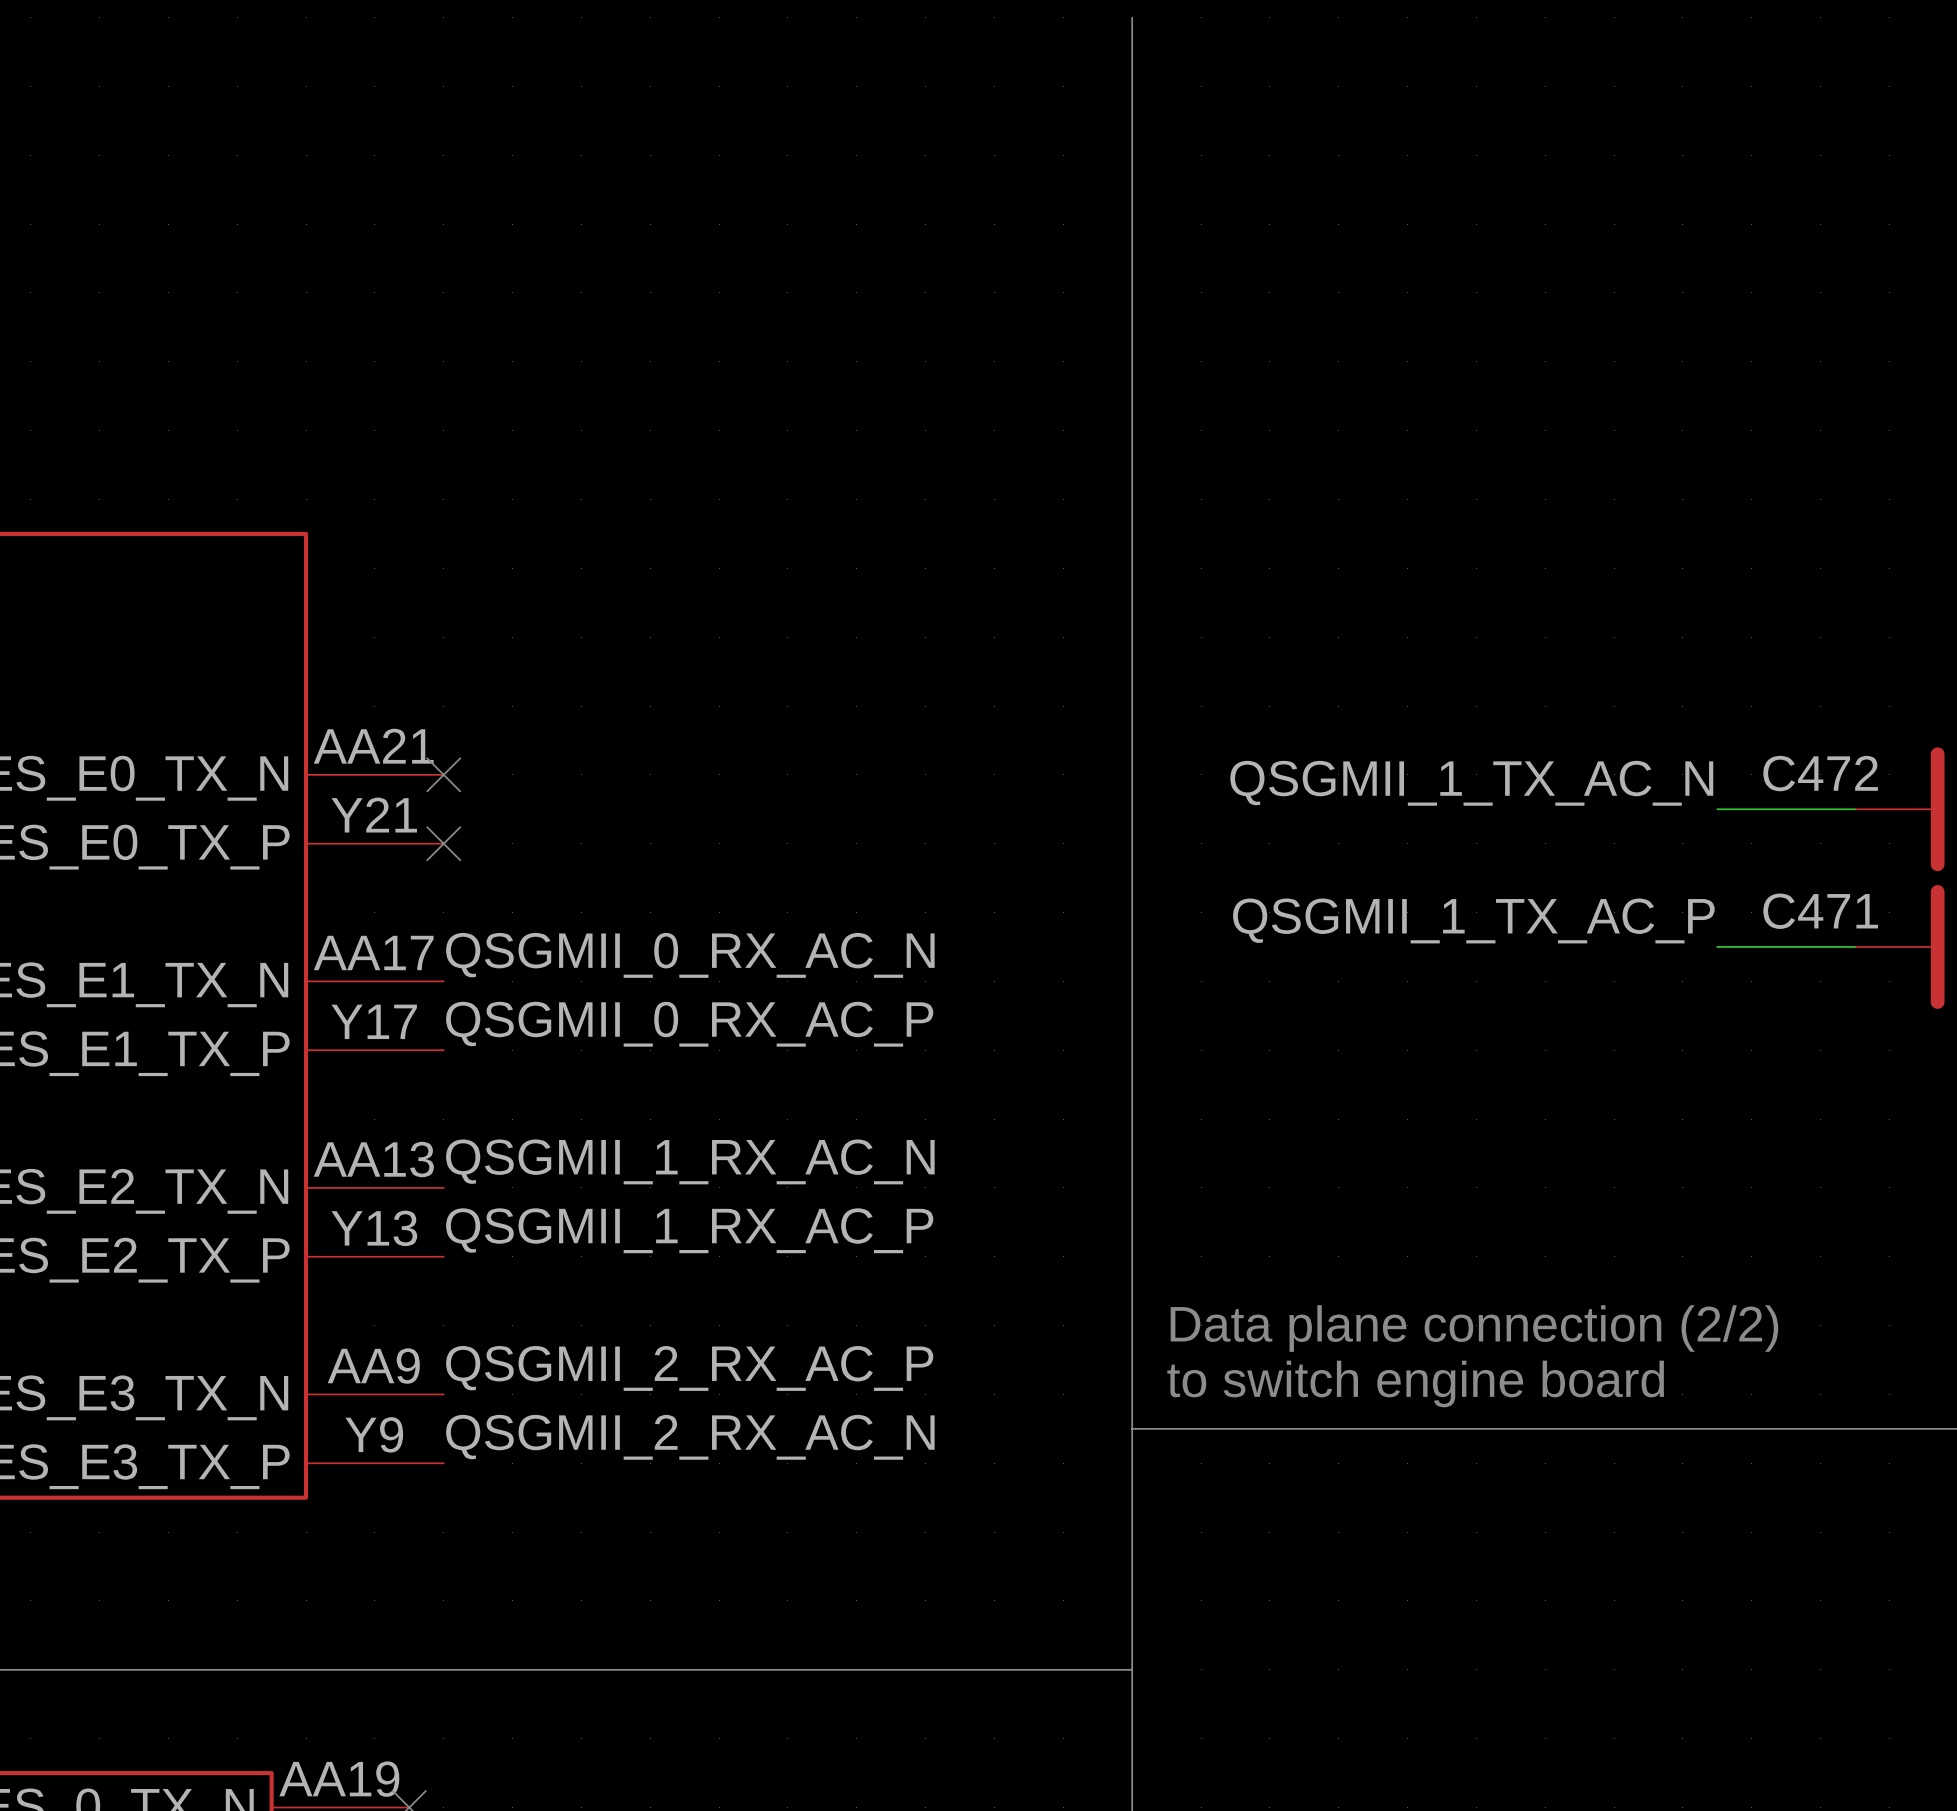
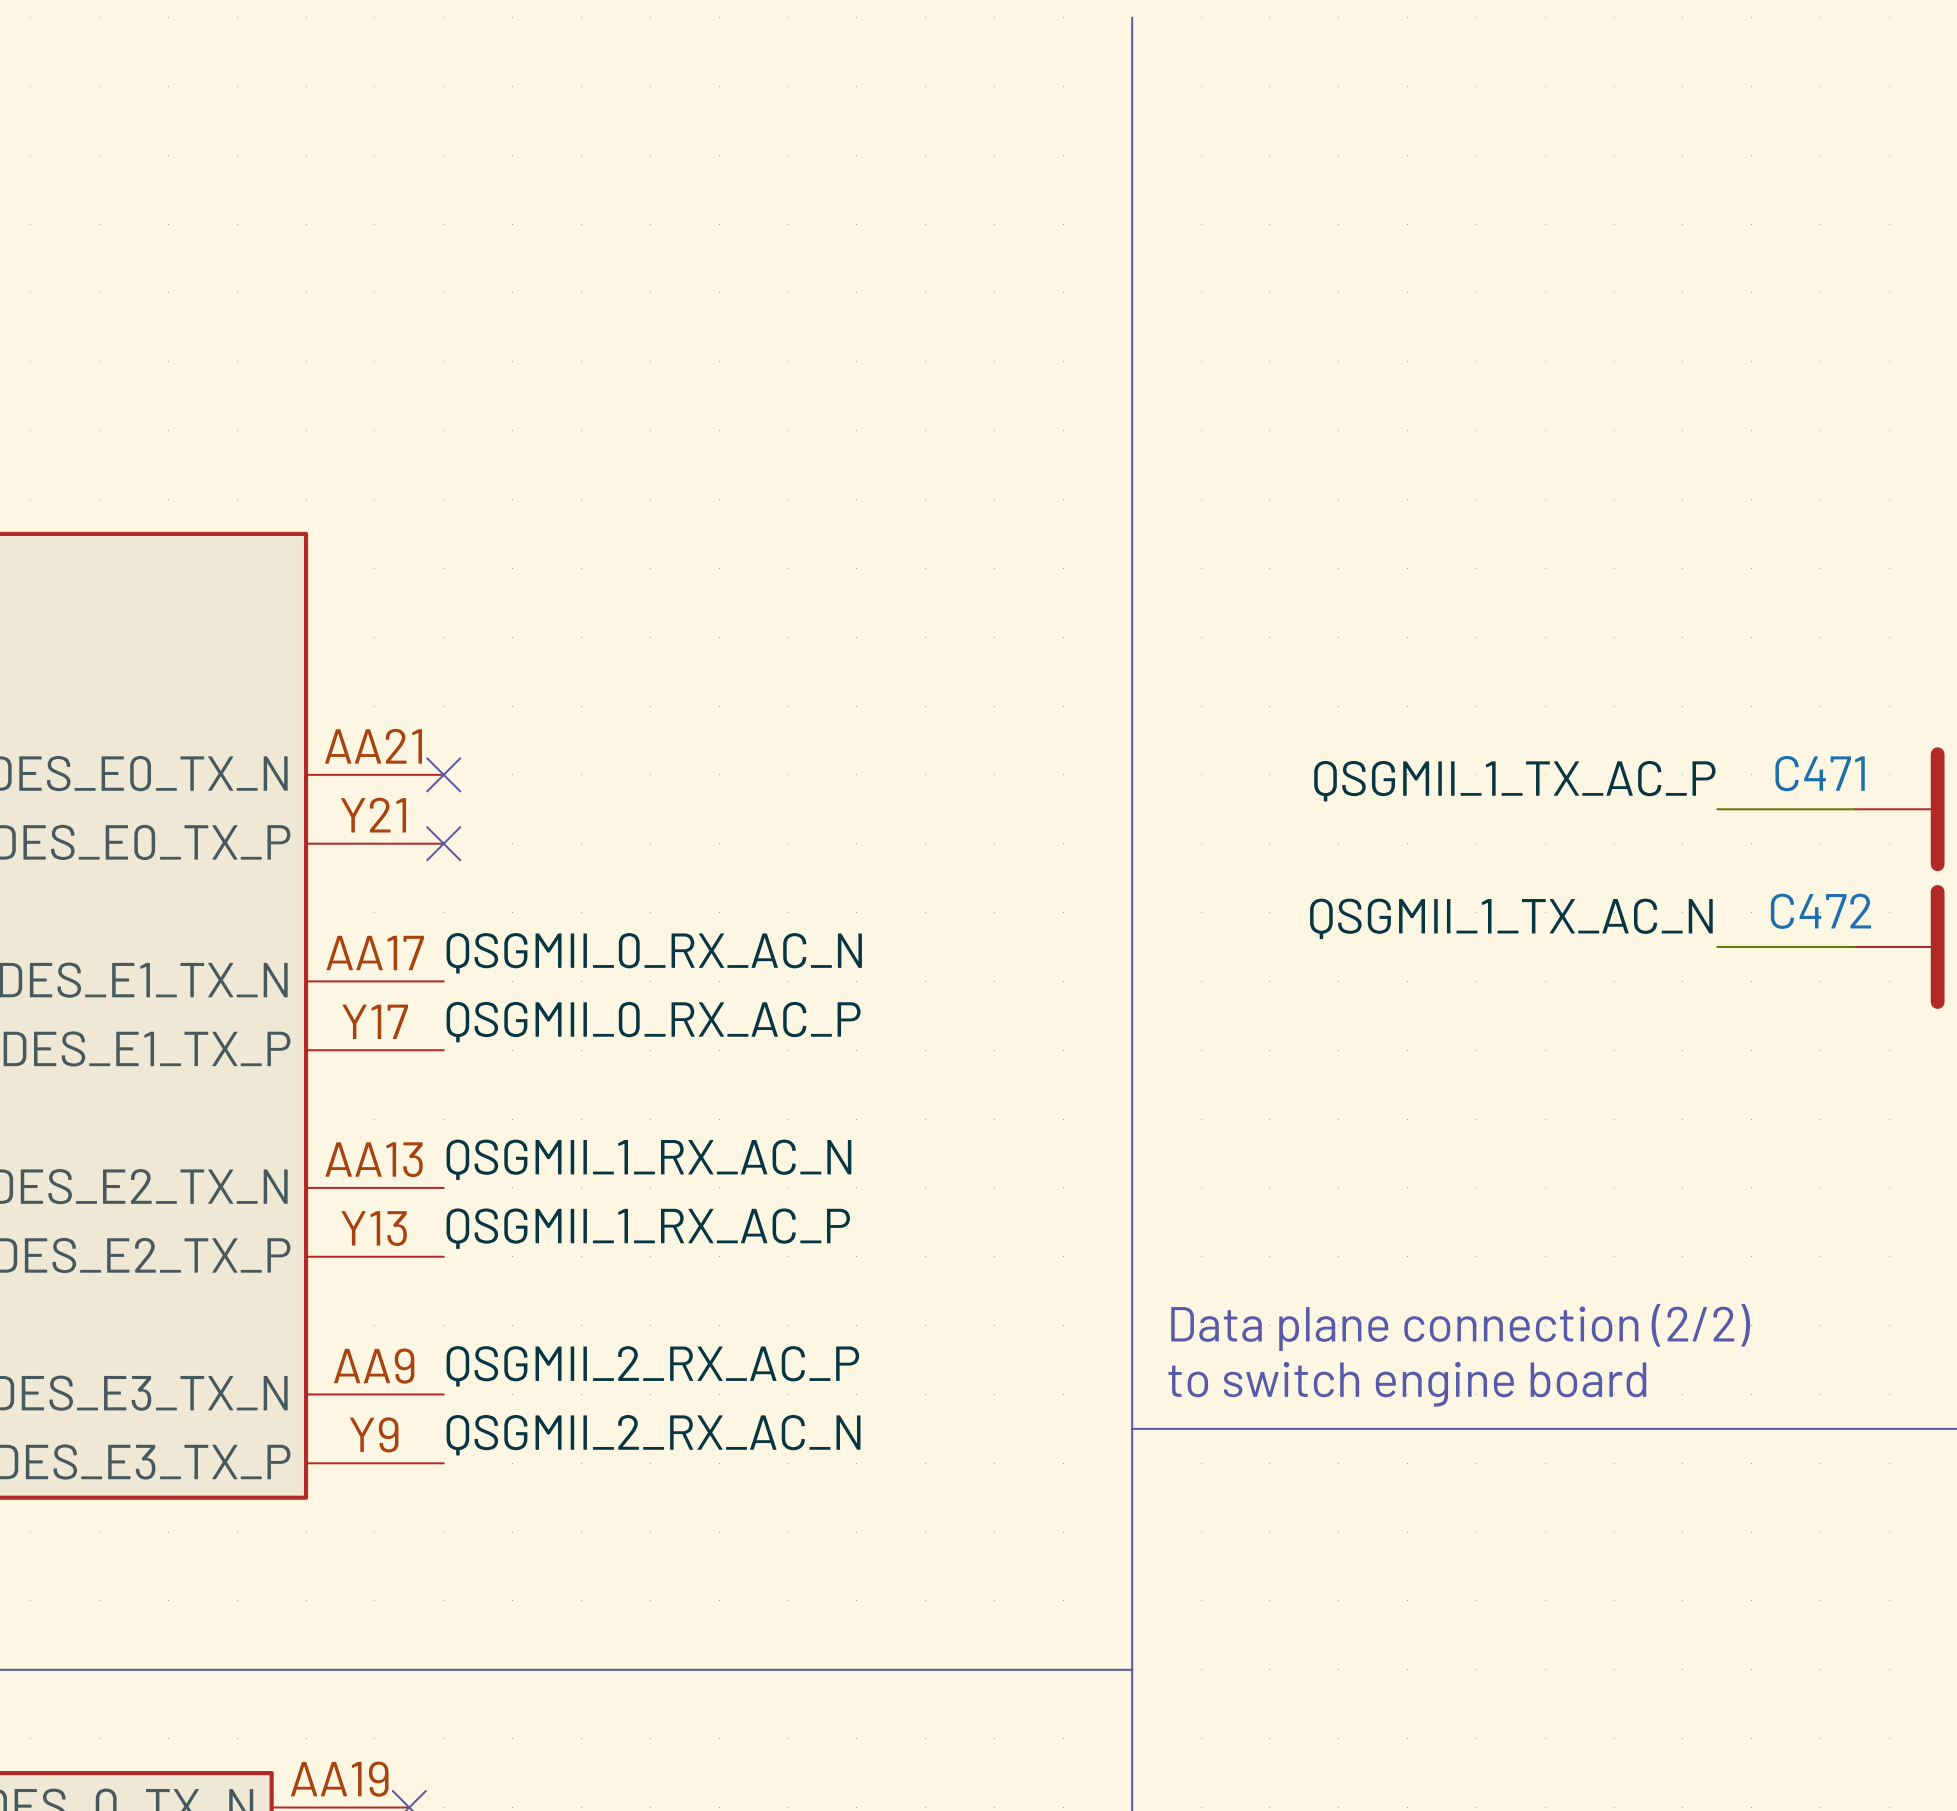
C472 name: C472 (1820, 773) -> C471 (1820, 773)
label: QSGMII_1_TX_AC_N (1471, 783) -> QSGMII_1_TX_AC_P (1514, 781)
C471 name: C471 (1820, 911) -> C472 (1820, 911)
label: QSGMII_1_TX_AC_P (1473, 920) -> QSGMII_1_TX_AC_N (1511, 918)

